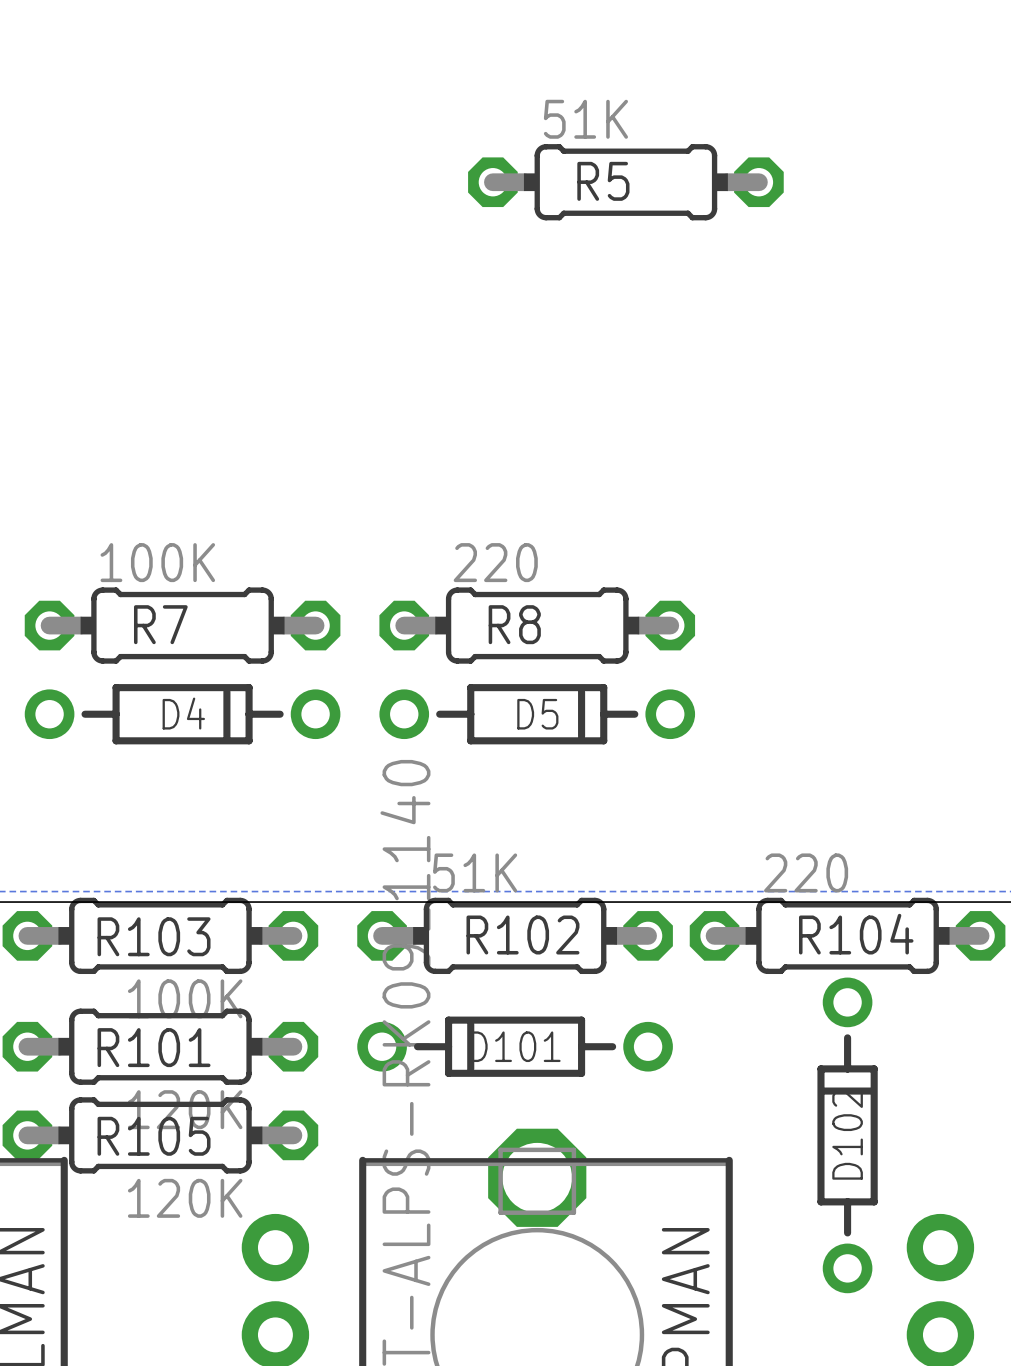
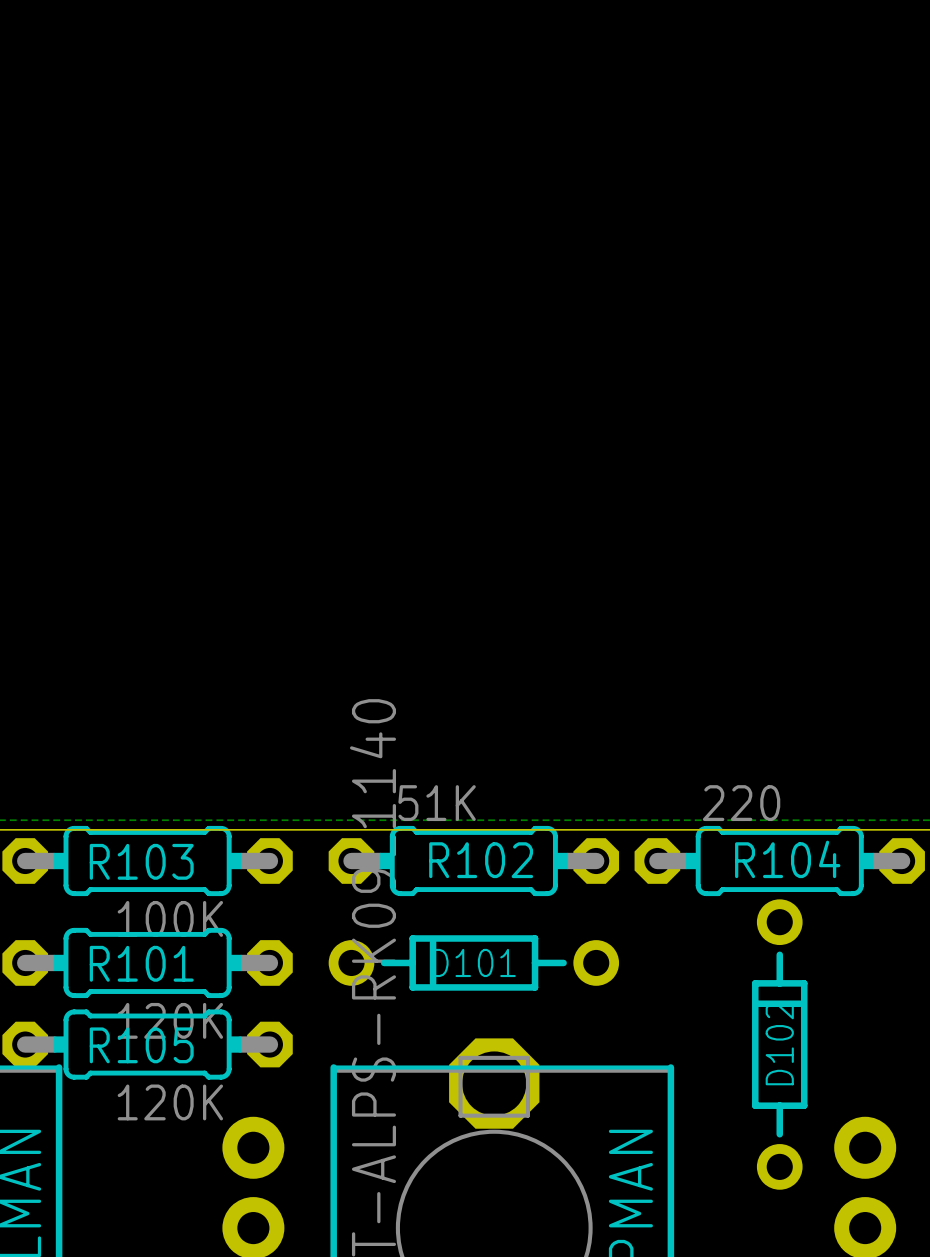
R5: 51K (625, 182) -> none
R7: 100K (182, 625) -> none
R8: 220 (537, 625) -> none
D4: (182, 714) -> none
D5: (537, 714) -> none

